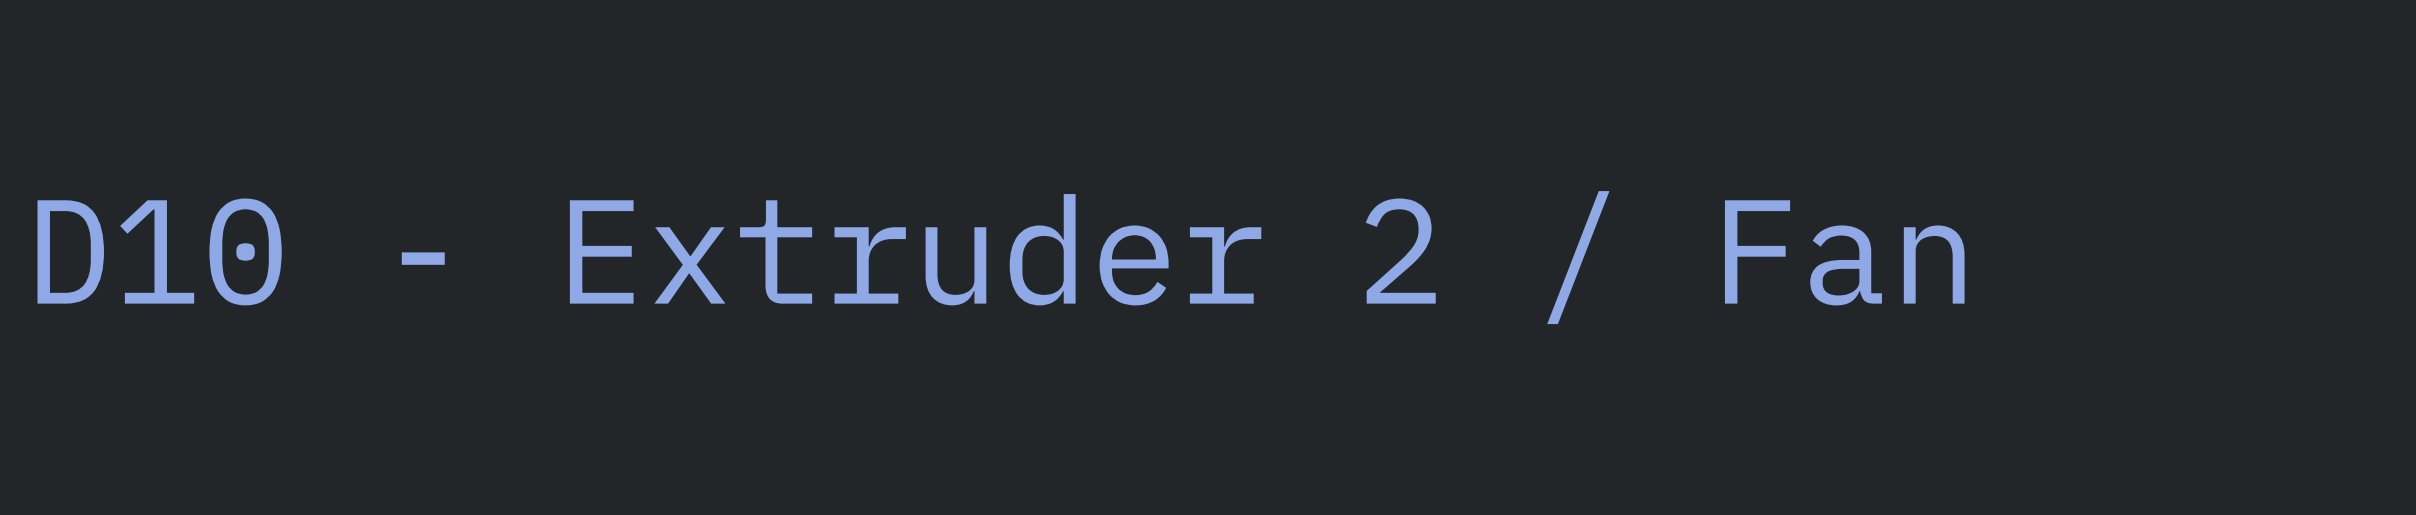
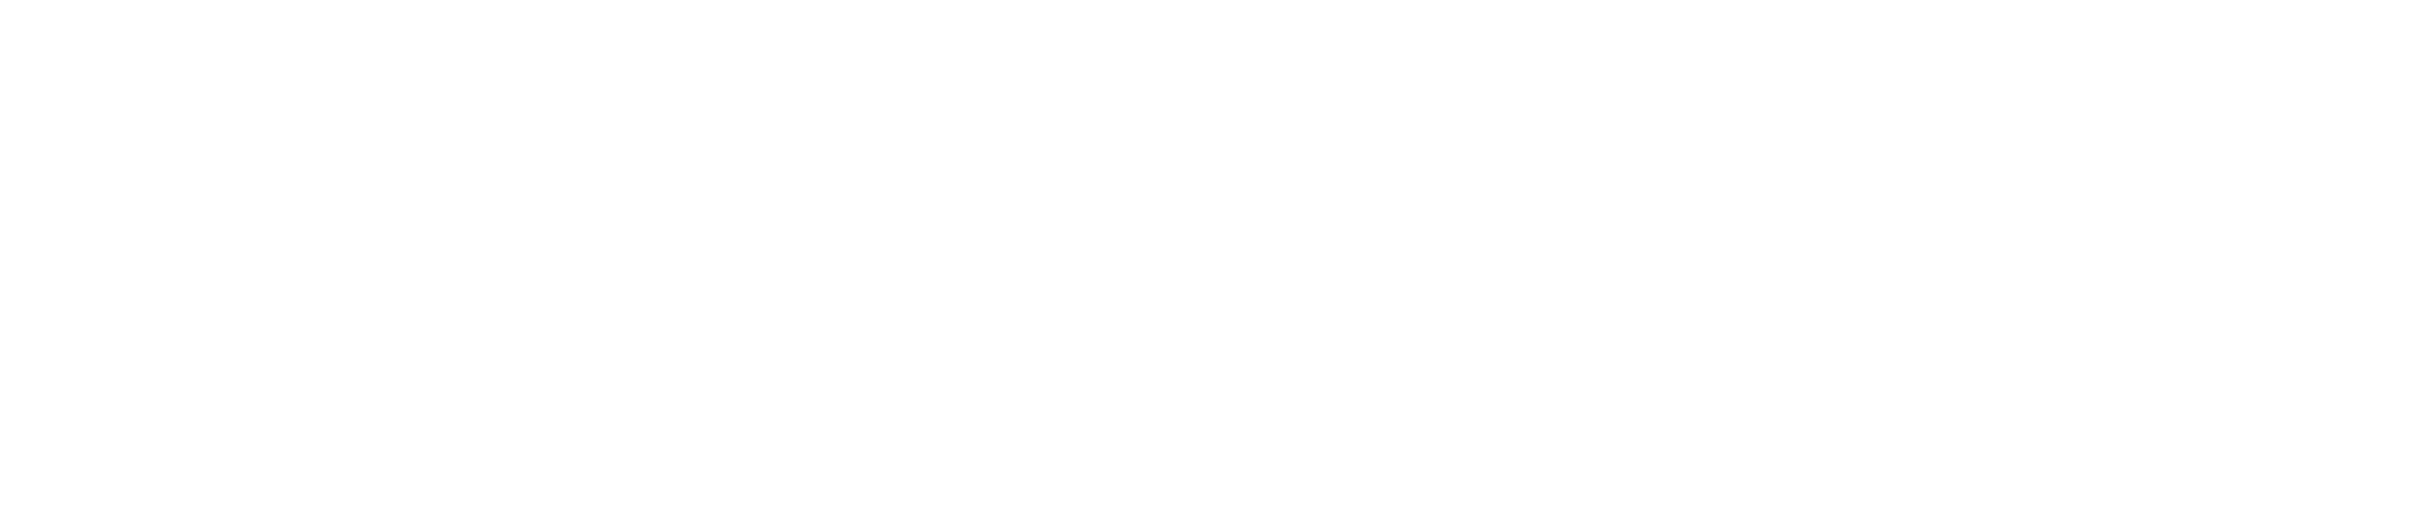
text: D10 - Extruder 2 / Fan (1001, 257) -> none

